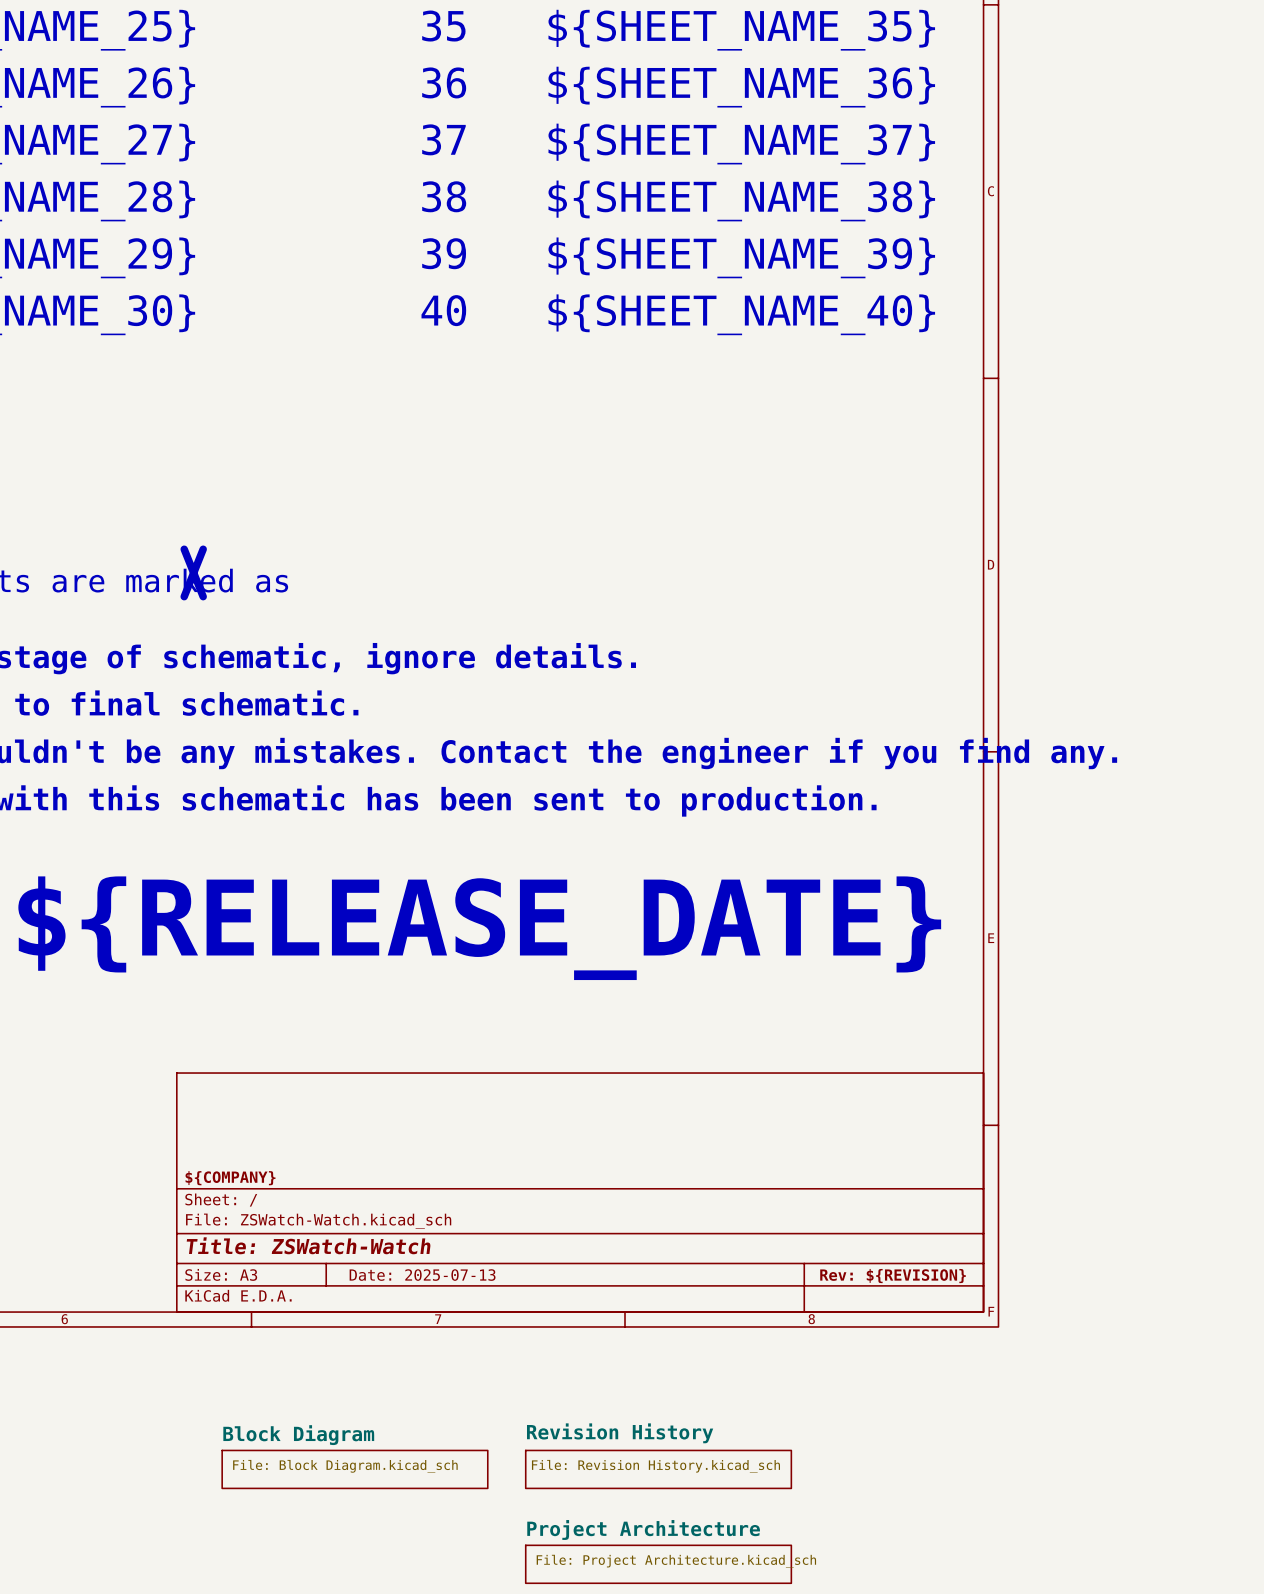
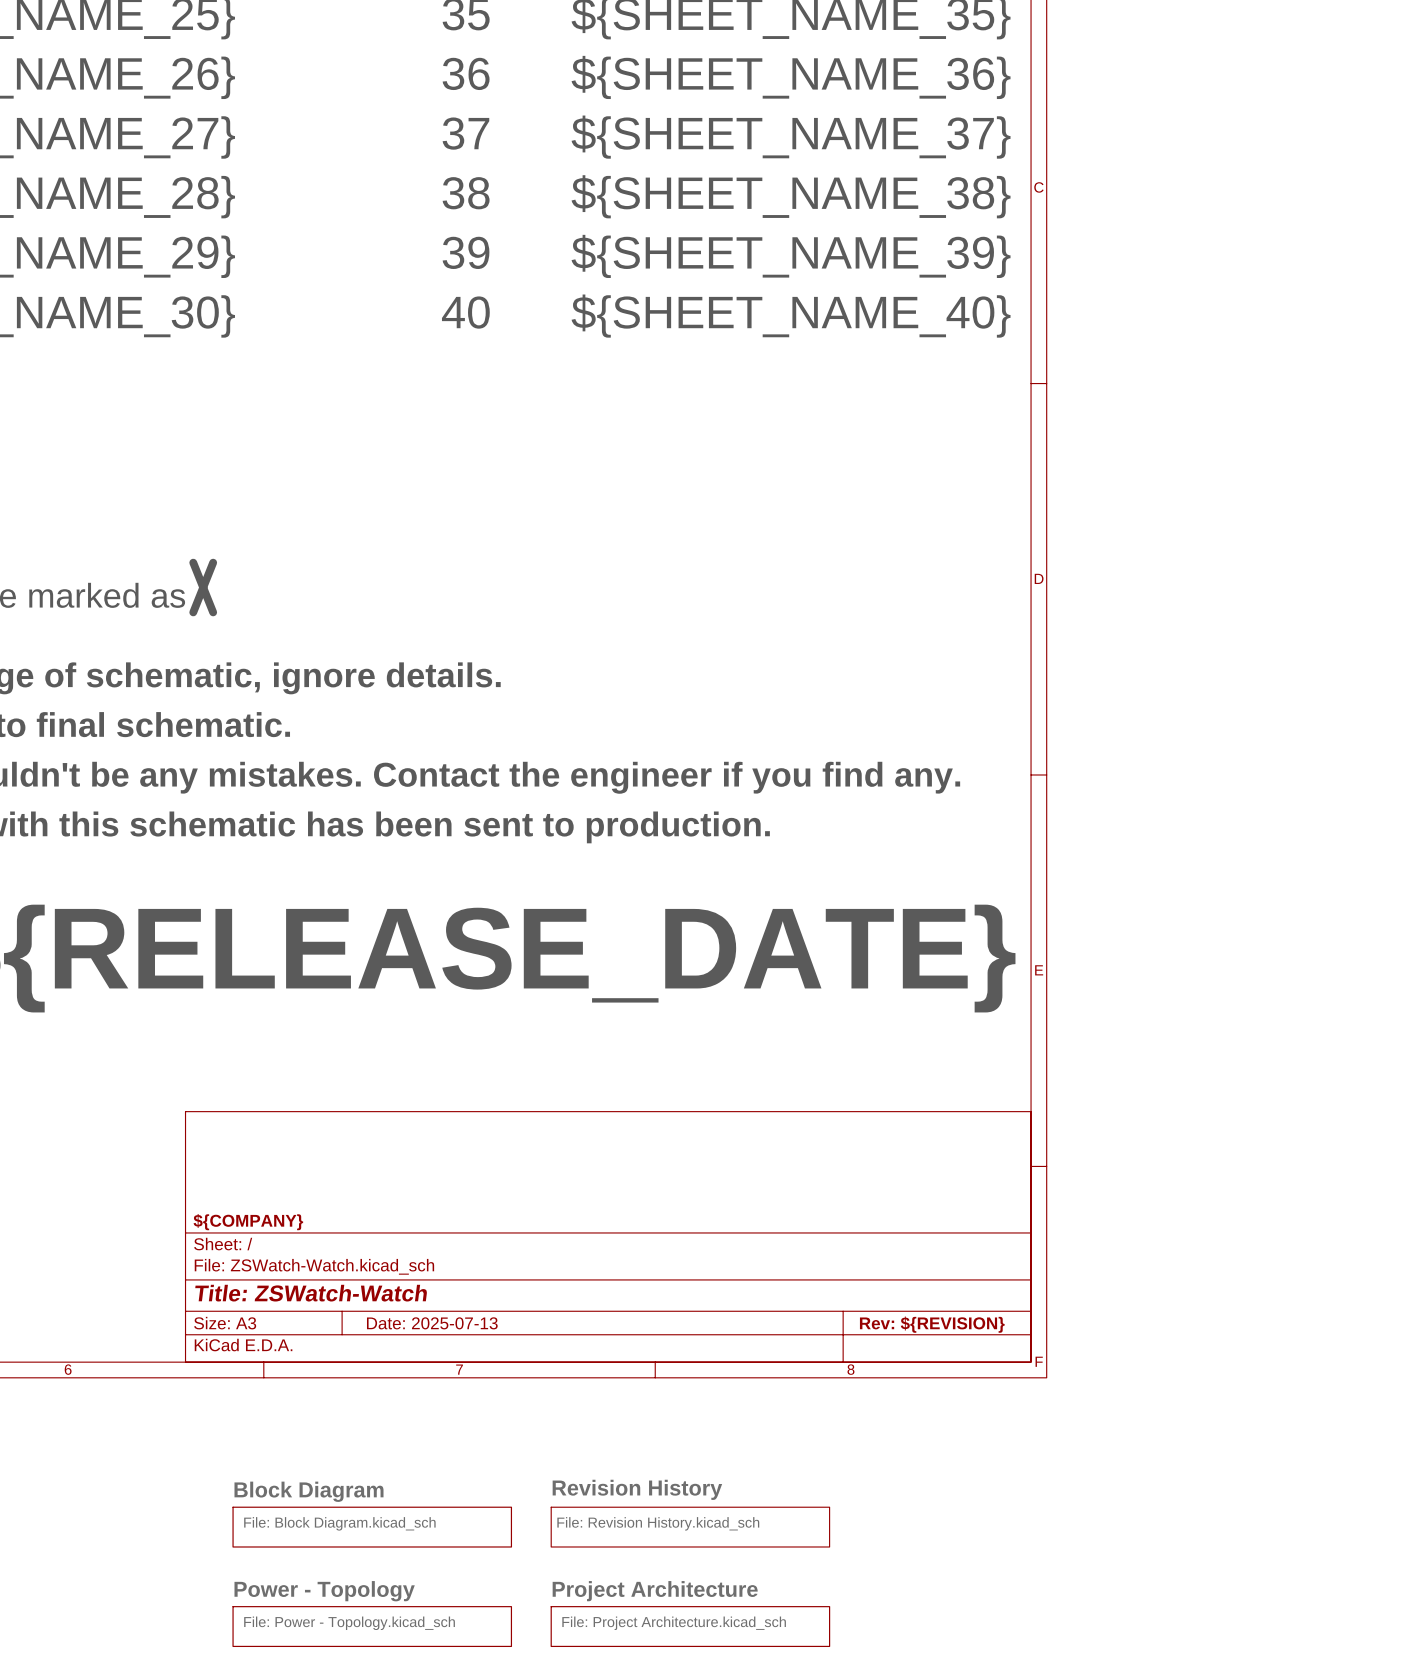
sheet Power - Topology: none -> File: Power - Topology.kicad_sch (372, 1626)

